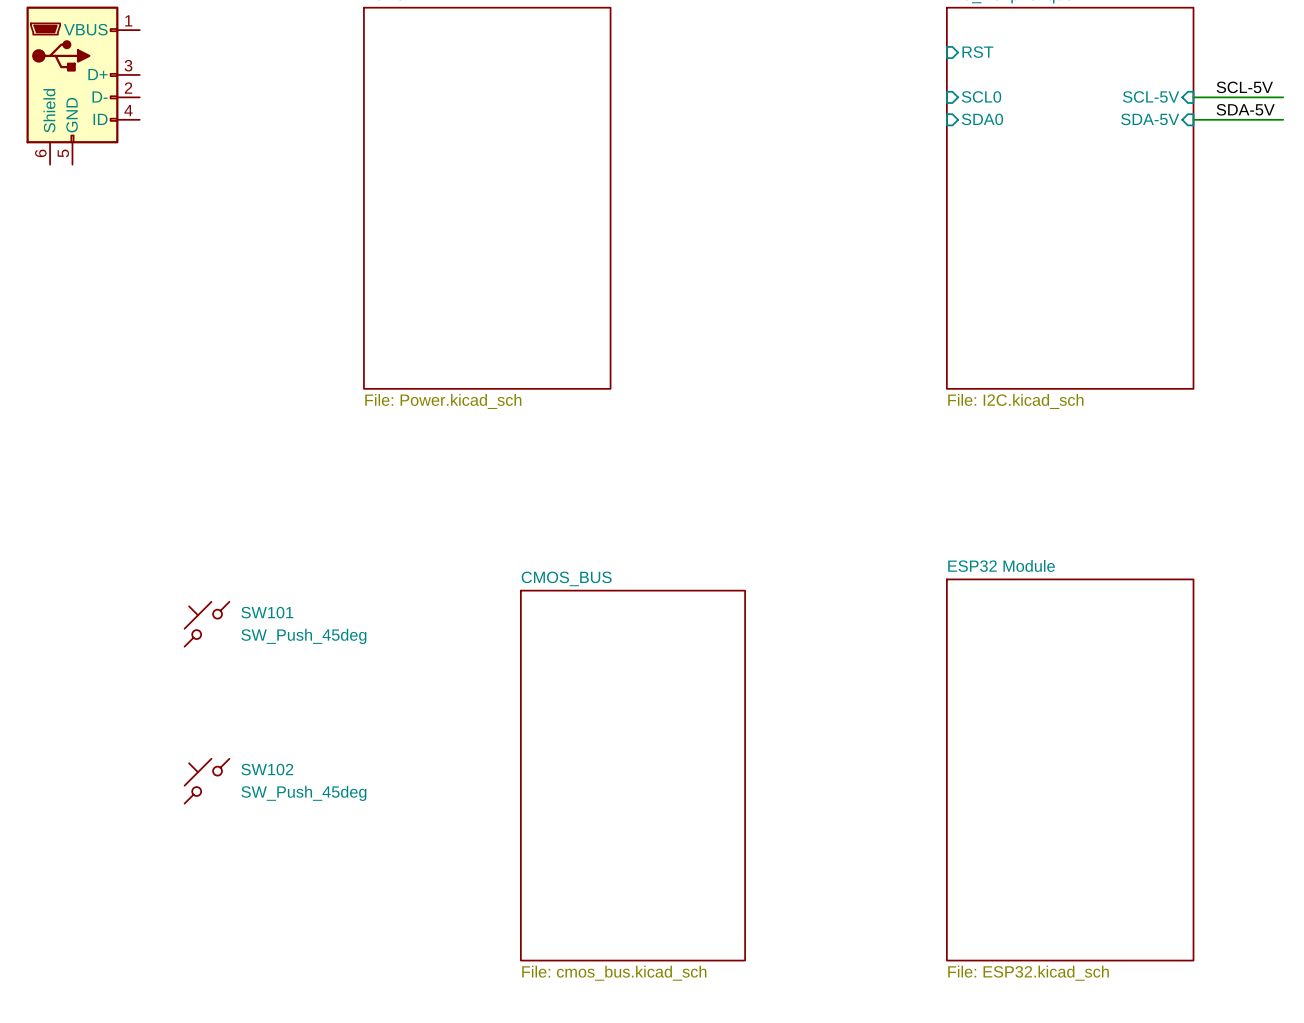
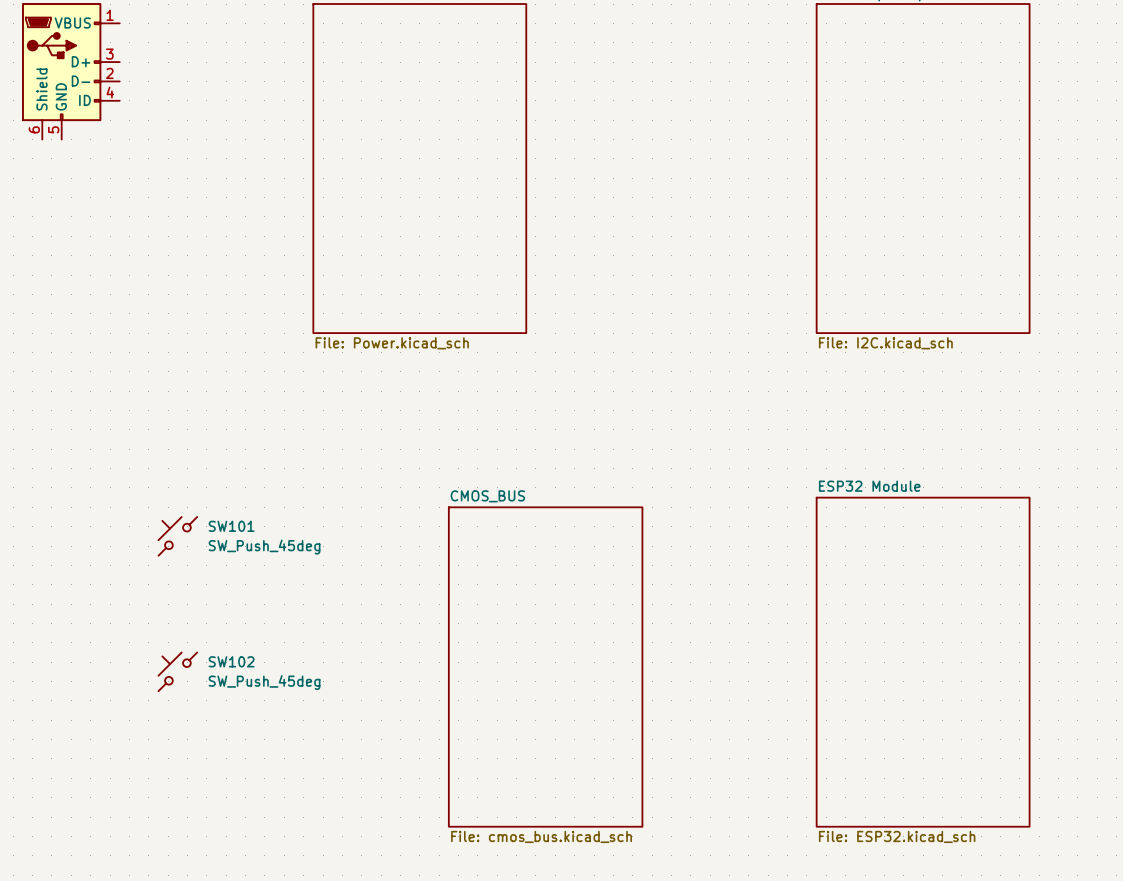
sheet pin: RST (977, 52) -> none
label: SCL-5V (1244, 87) -> none
sheet pin: SCL0 (981, 96) -> none
sheet pin: SCL-5V (1151, 96) -> none
wire: (1193, 97) (1283, 97) -> none
label: SDA-5V (1245, 109) -> none
sheet pin: SDA0 (982, 119) -> none
sheet pin: SDA-5V (1150, 119) -> none
wire: (1193, 119) (1283, 119) -> none

